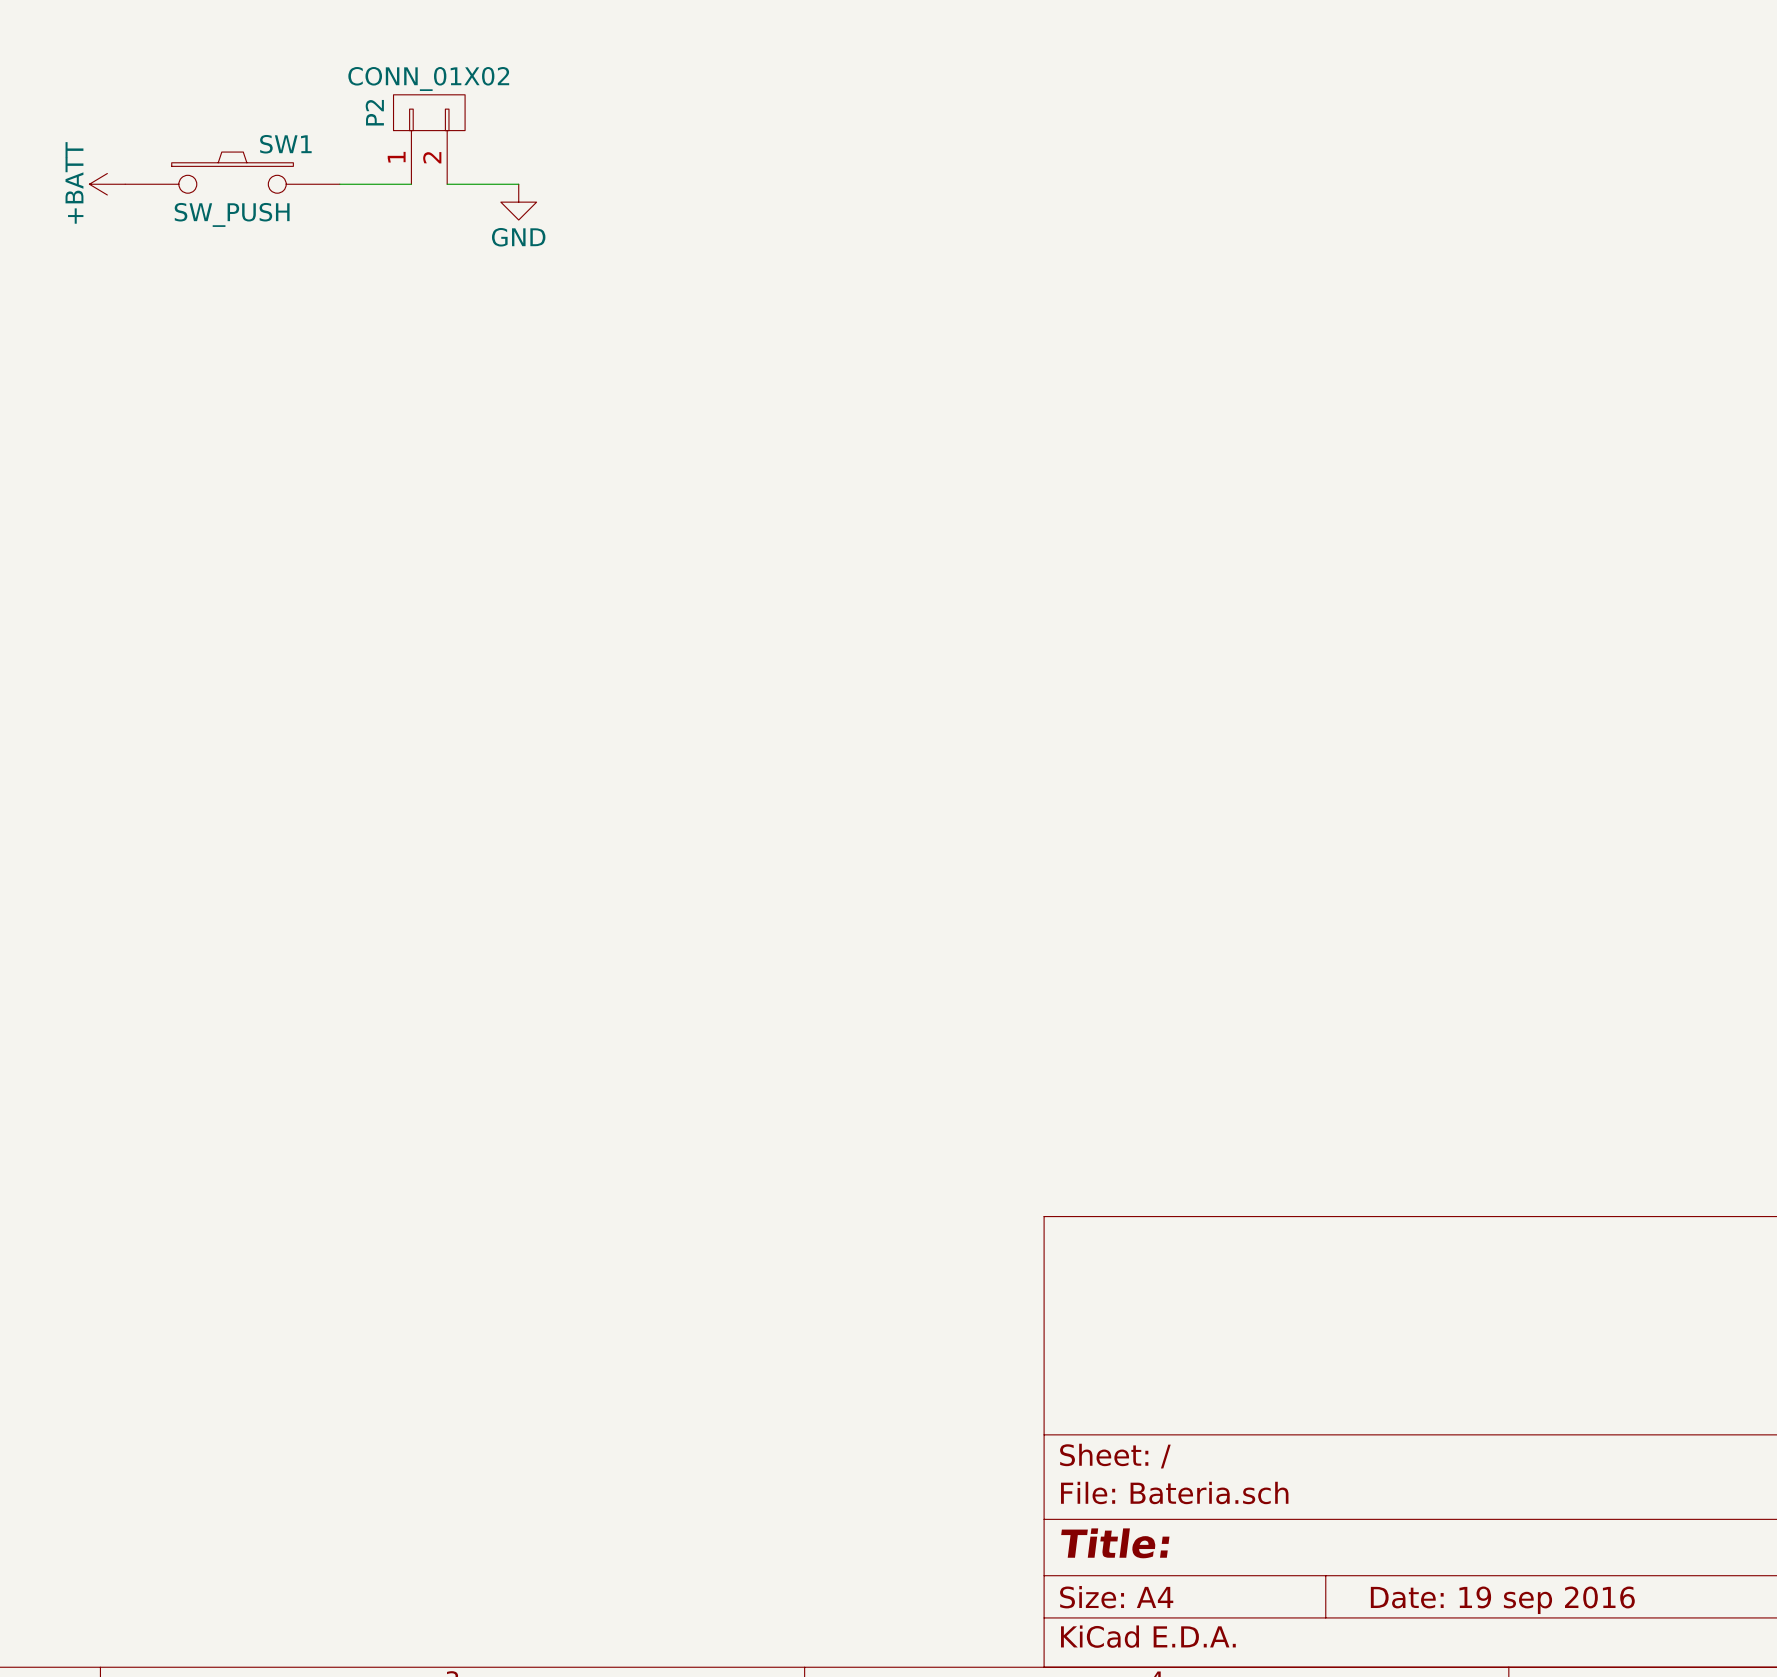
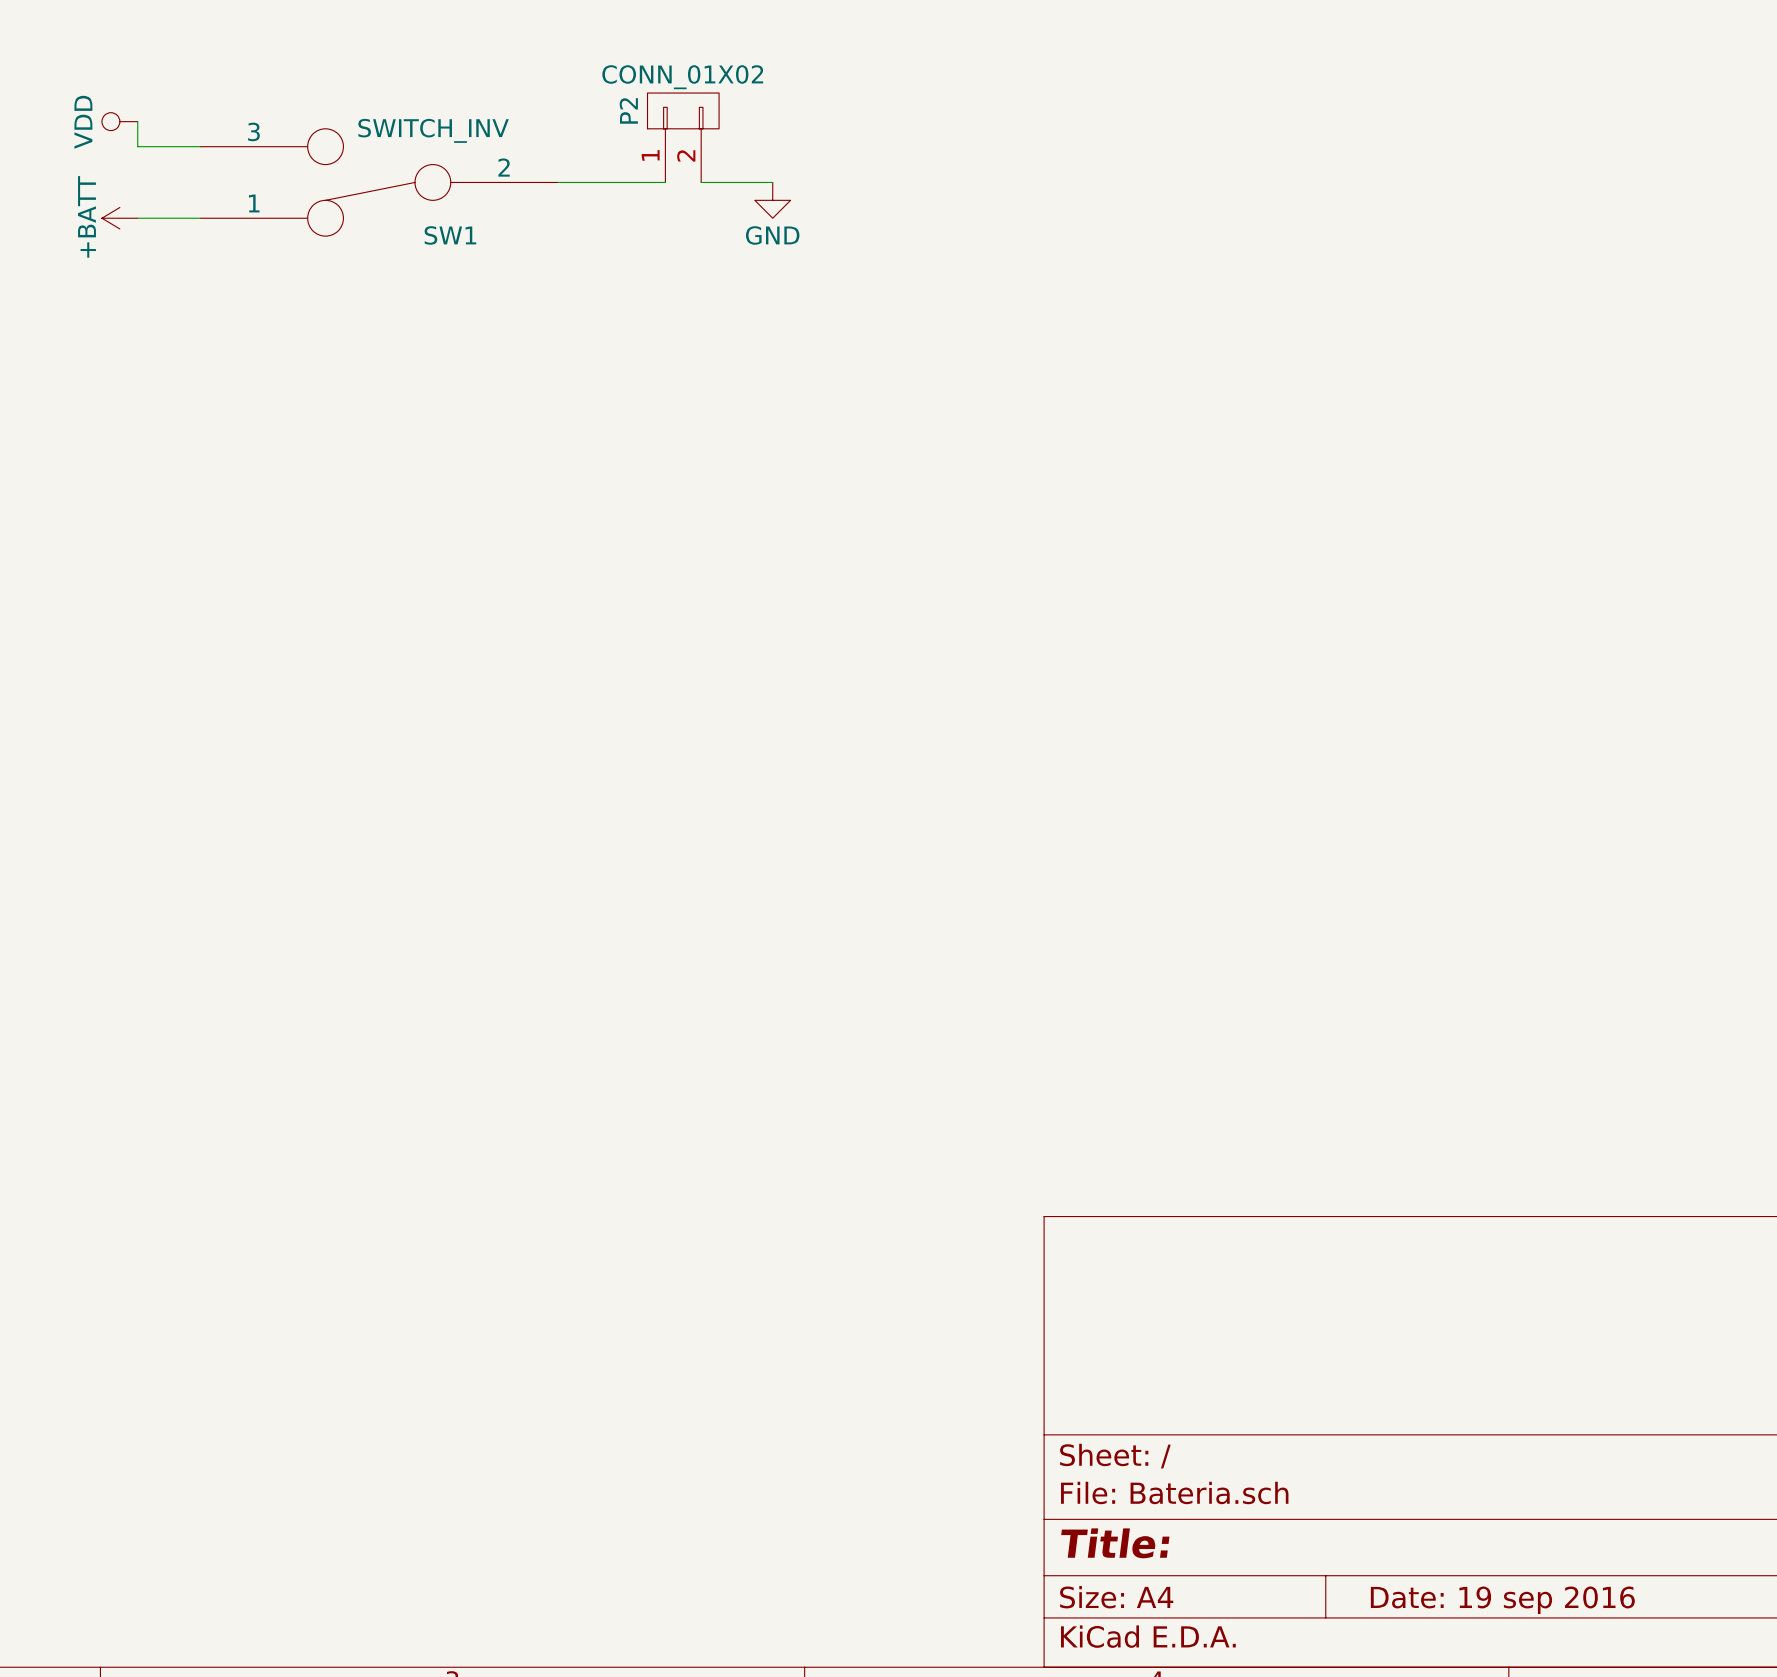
power symbol: none -> VDD (119, 121)
wire: none -> (137, 121) (137, 146) (200, 146)
P2 position: (429, 139) -> (683, 137)
SW1 name position: SW1 (285, 144) -> SW1 (450, 235)
SW1 symbol: [125, 152, 340, 194] -> [200, 128, 559, 237]
wire: none -> (558, 182) (665, 182)
power symbol position: +BATT (107, 184) -> +BATT (119, 218)
wire: (339, 184) (411, 184) -> none
wire: (447, 184) (518, 184) -> (701, 182) (772, 182)
power symbol position: GND (518, 202) -> GND (772, 200)
SW1 value: SW_PUSH (232, 214) -> SWITCH_INV (433, 130)
wire: none -> (137, 218) (200, 218)

